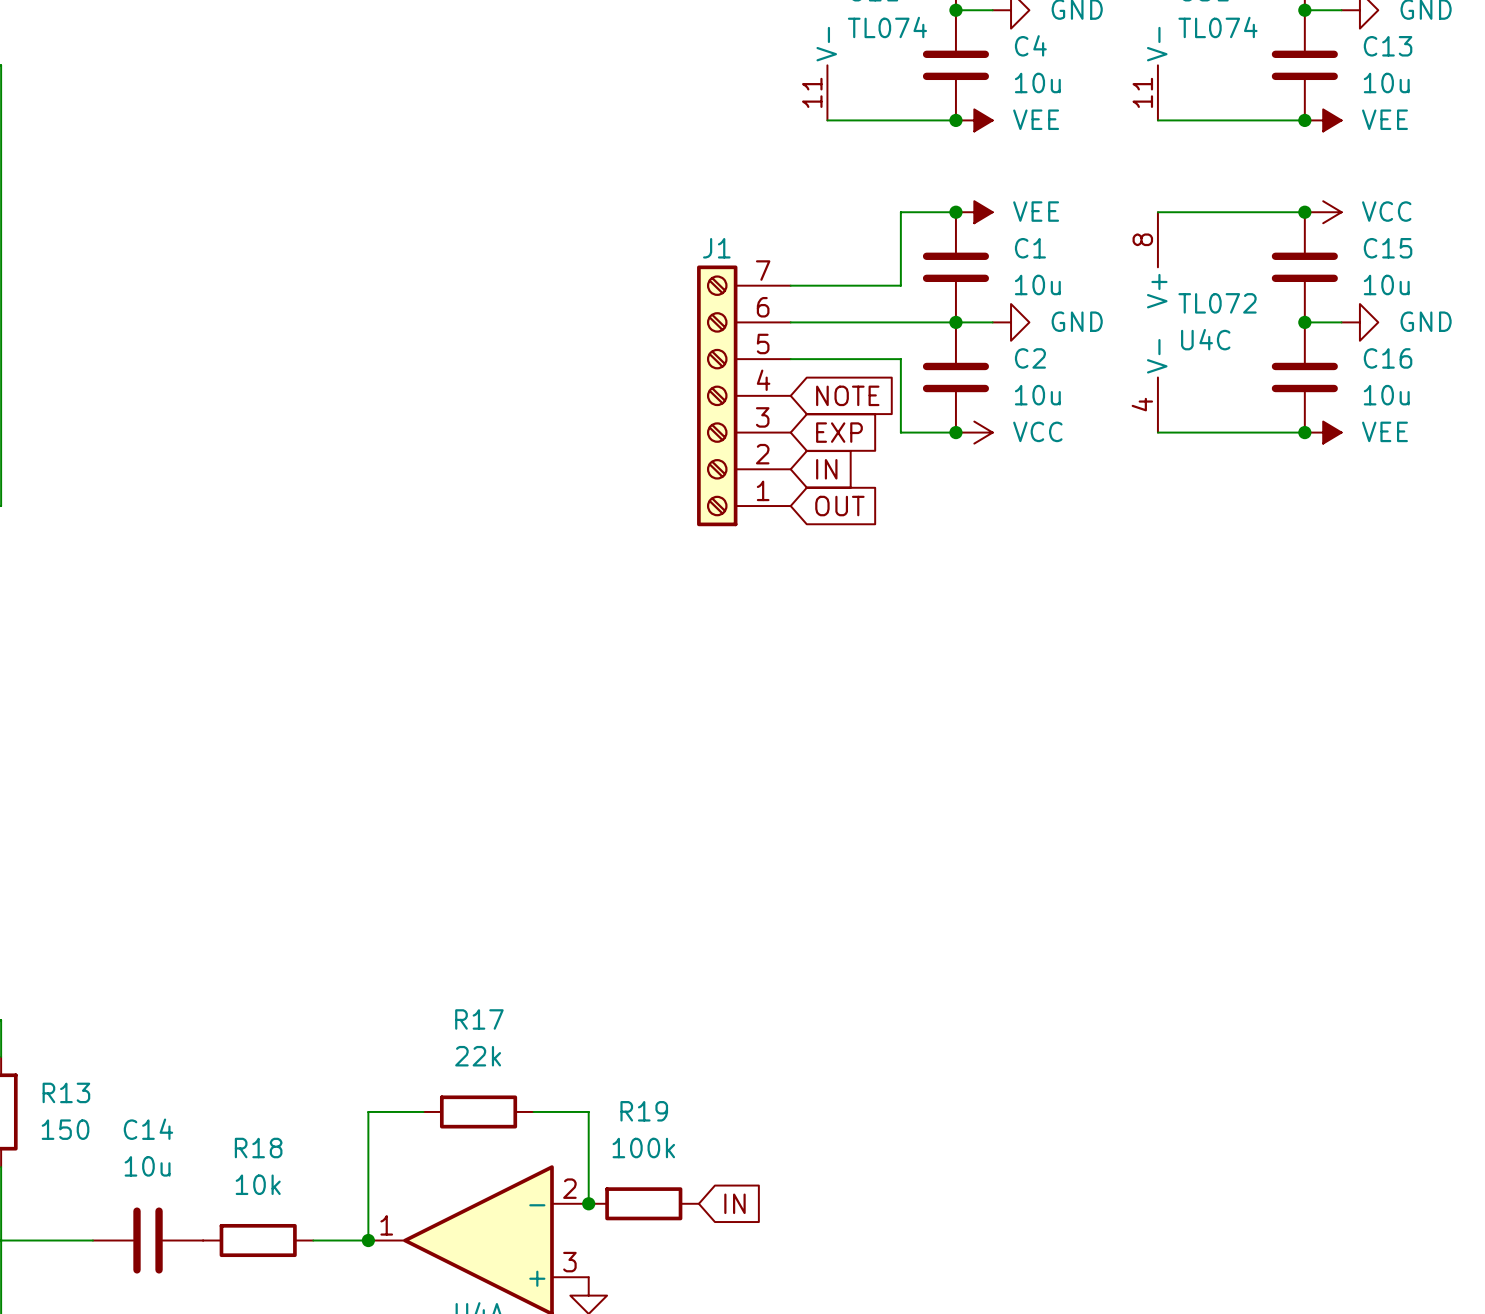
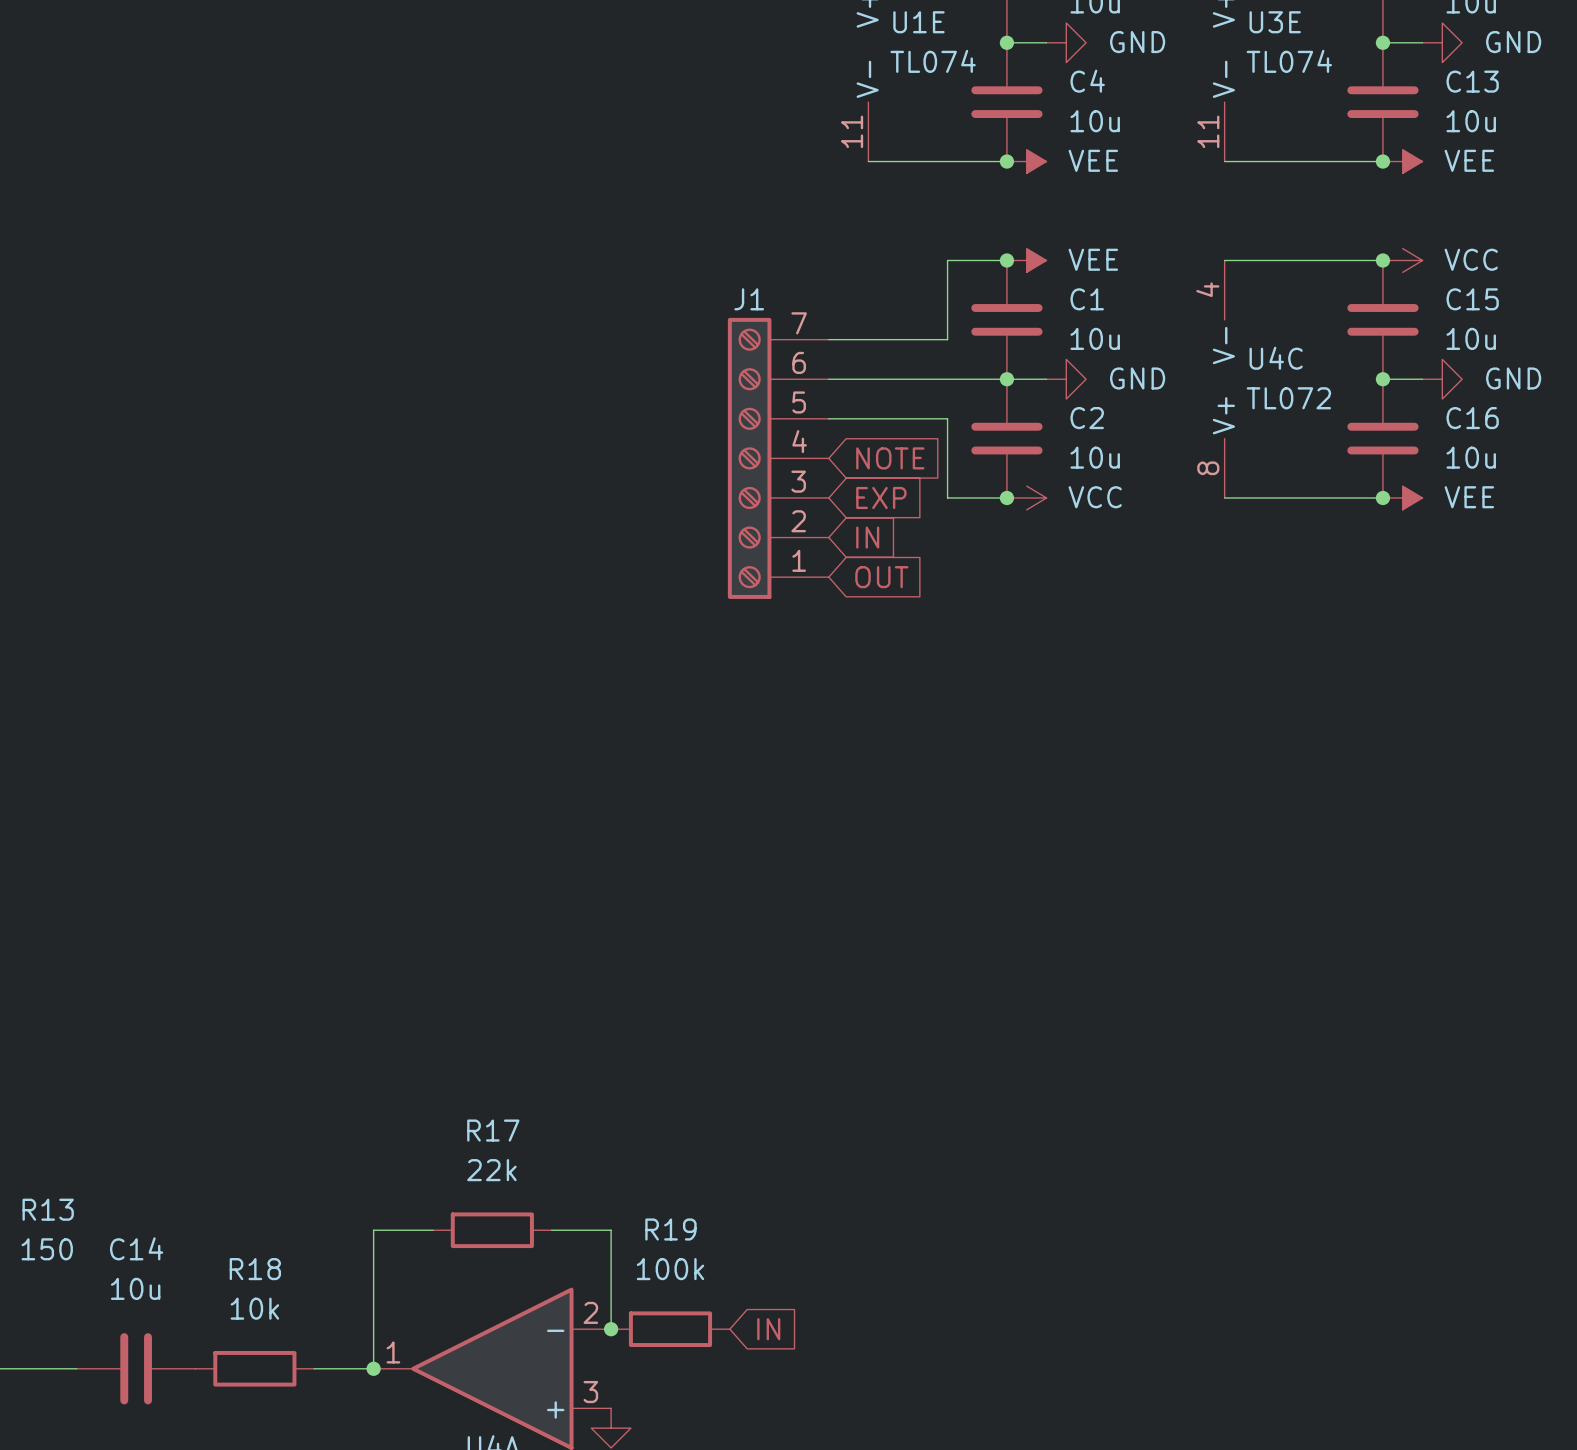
U4C value position: TL072 (1217, 303) -> TL072 (1288, 398)
U4C rotation: 0° (1157, 322) -> 180° (1224, 379)
U4C name position: U4C (1205, 339) -> U4C (1276, 358)

